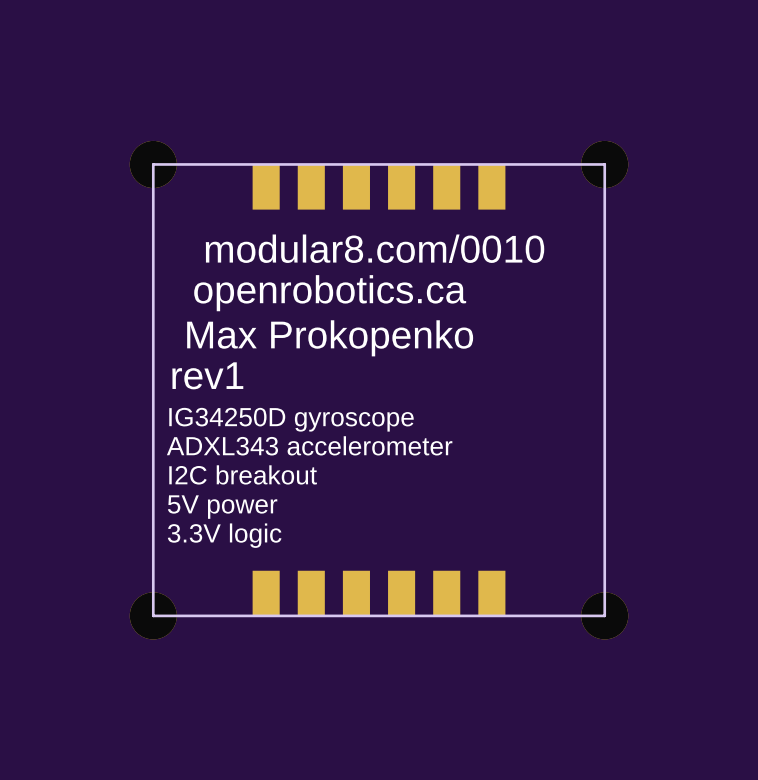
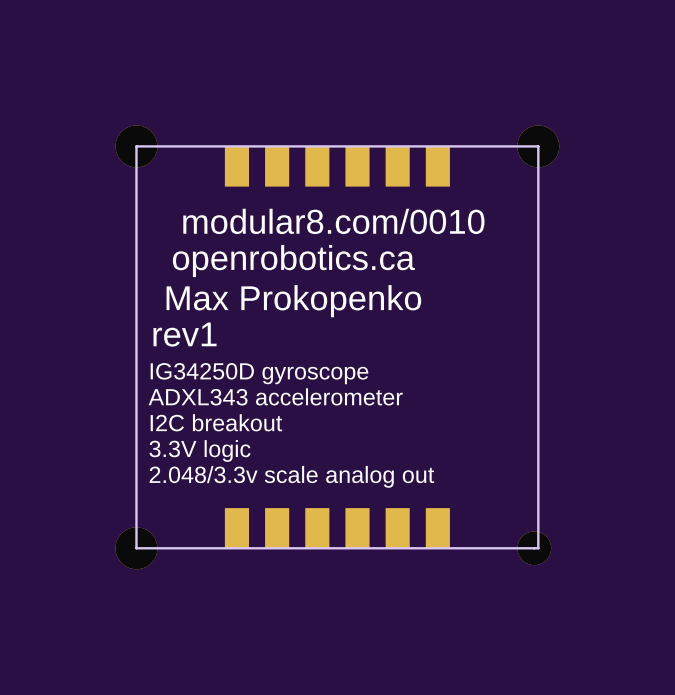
text: 5V power (222, 507) -> 3.3V logic (199, 450)
text: 3.3V logic (224, 535) -> 2.048/3.3v scale analog out (291, 476)
part footprint: [581, 592, 629, 640] -> [517, 531, 552, 566]

